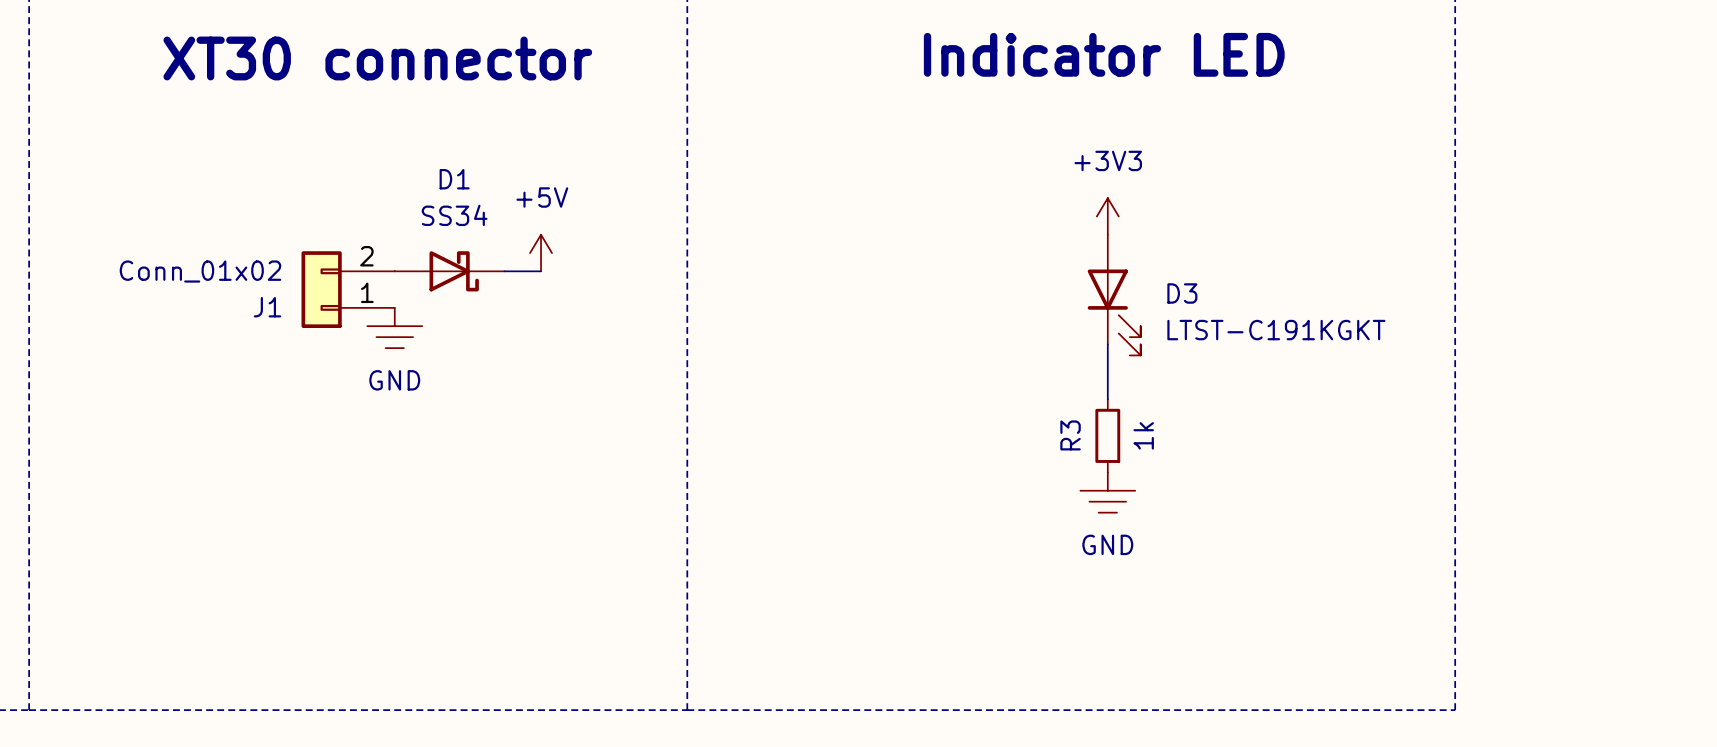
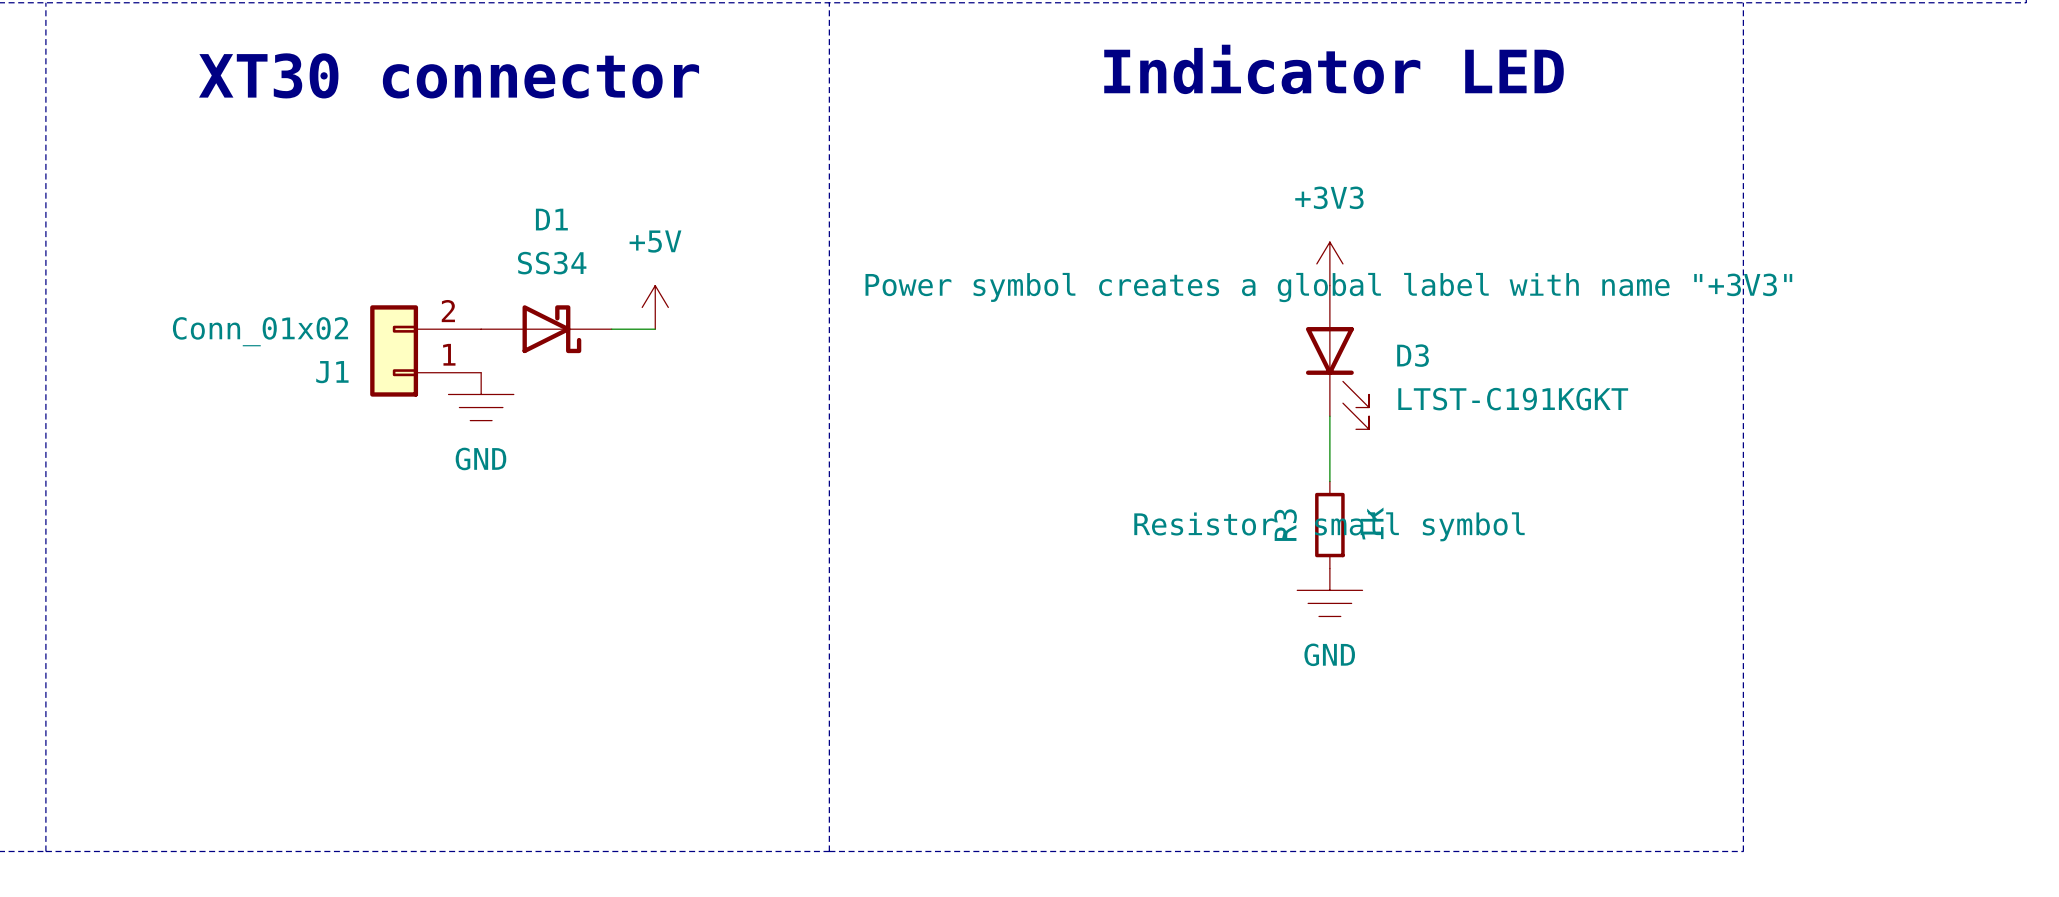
power symbol text: none -> Power symbol creates a global label with name "+3V3" (1328, 287)
R3 text: none -> Resistor, small symbol (1329, 526)

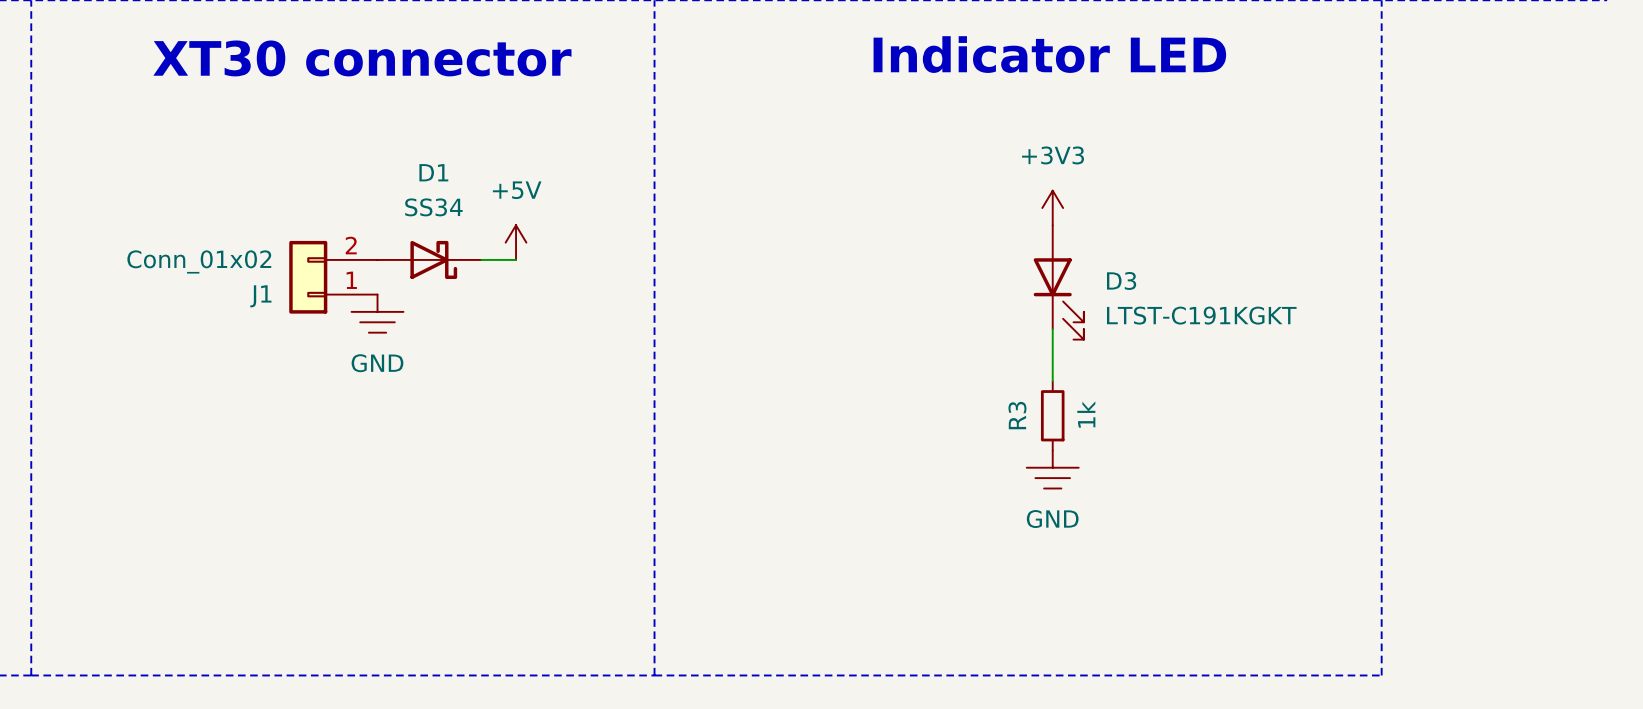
power symbol text: Power symbol creates a global label with name "+3V3" (1328, 287) -> none
R3 text: Resistor, small symbol (1329, 526) -> none

